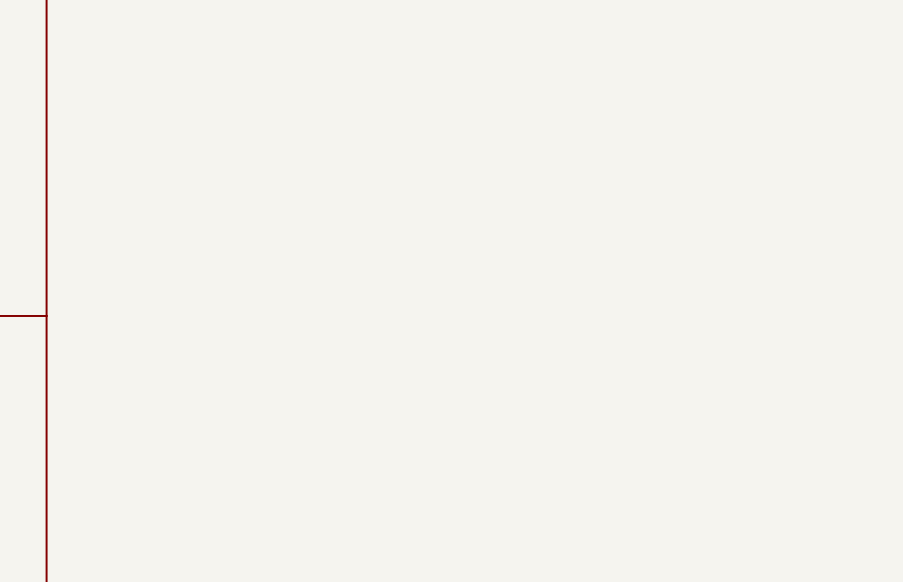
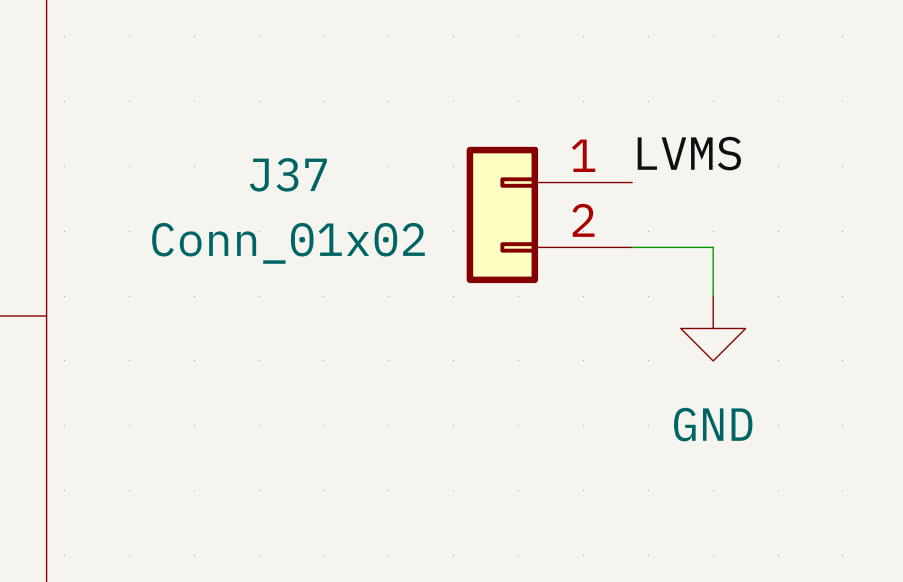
label: none -> LVMS (689, 153)
J37: none -> Conn_01x02 (549, 214)
wire: none -> (632, 247) (713, 247) (713, 296)
power symbol: none -> GND (713, 328)

